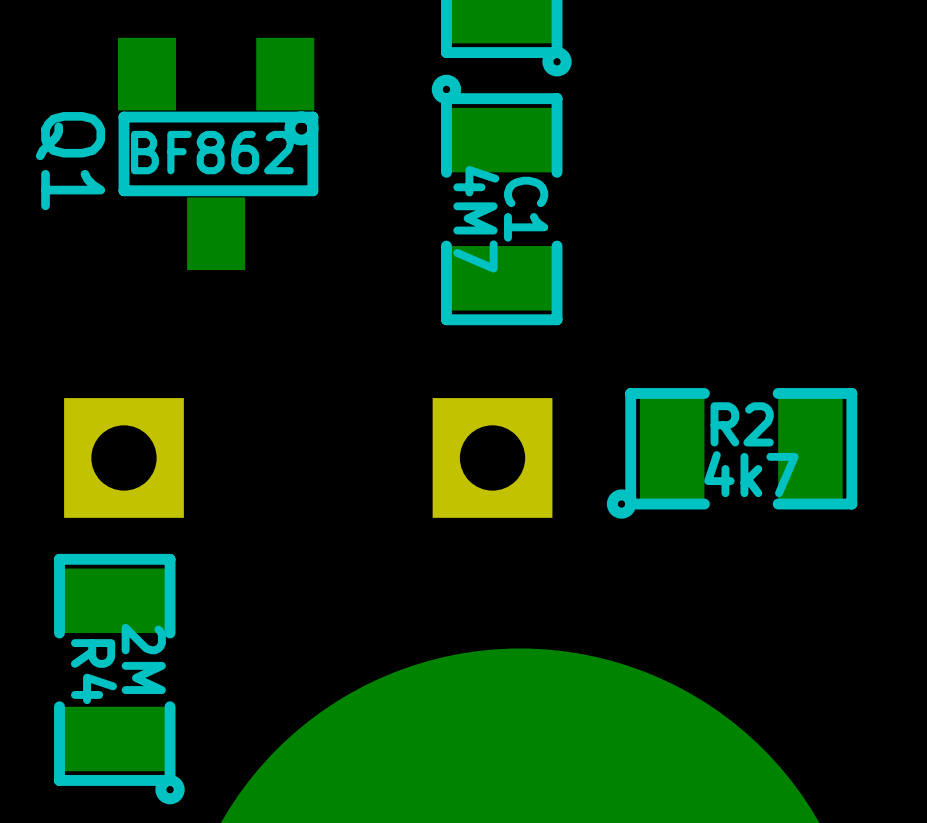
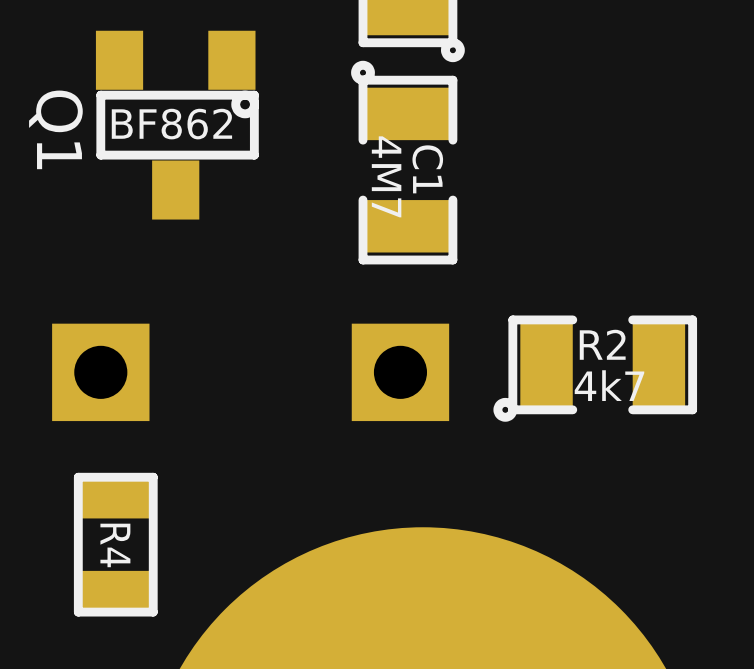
R4 footprint: [54, 553, 185, 805] -> [73, 472, 158, 617]
R4 value: 2M (143, 658) -> none
R4 name position: R4 (93, 671) -> R4 (115, 545)

